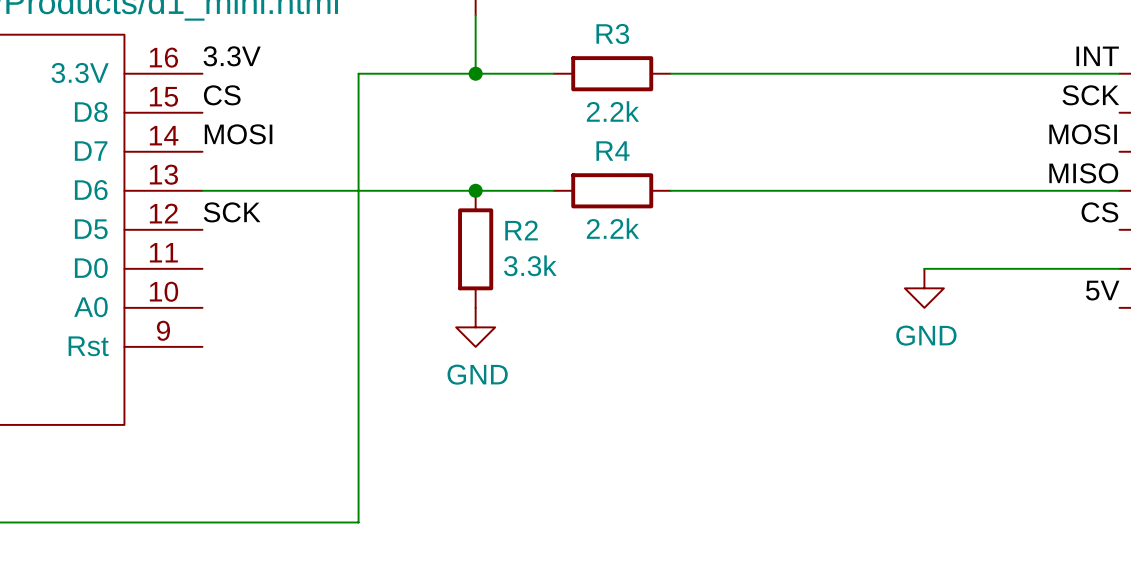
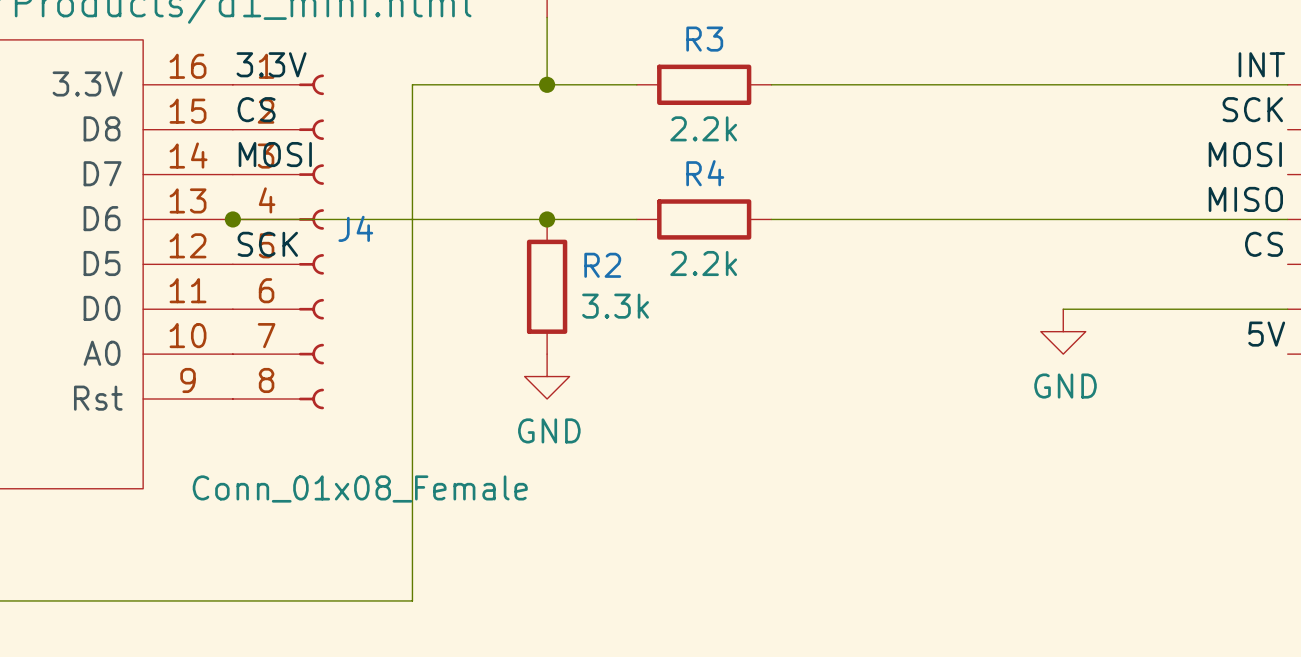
junction: none -> (232, 219)
J4: none -> Conn_01x08_Female (278, 241)

